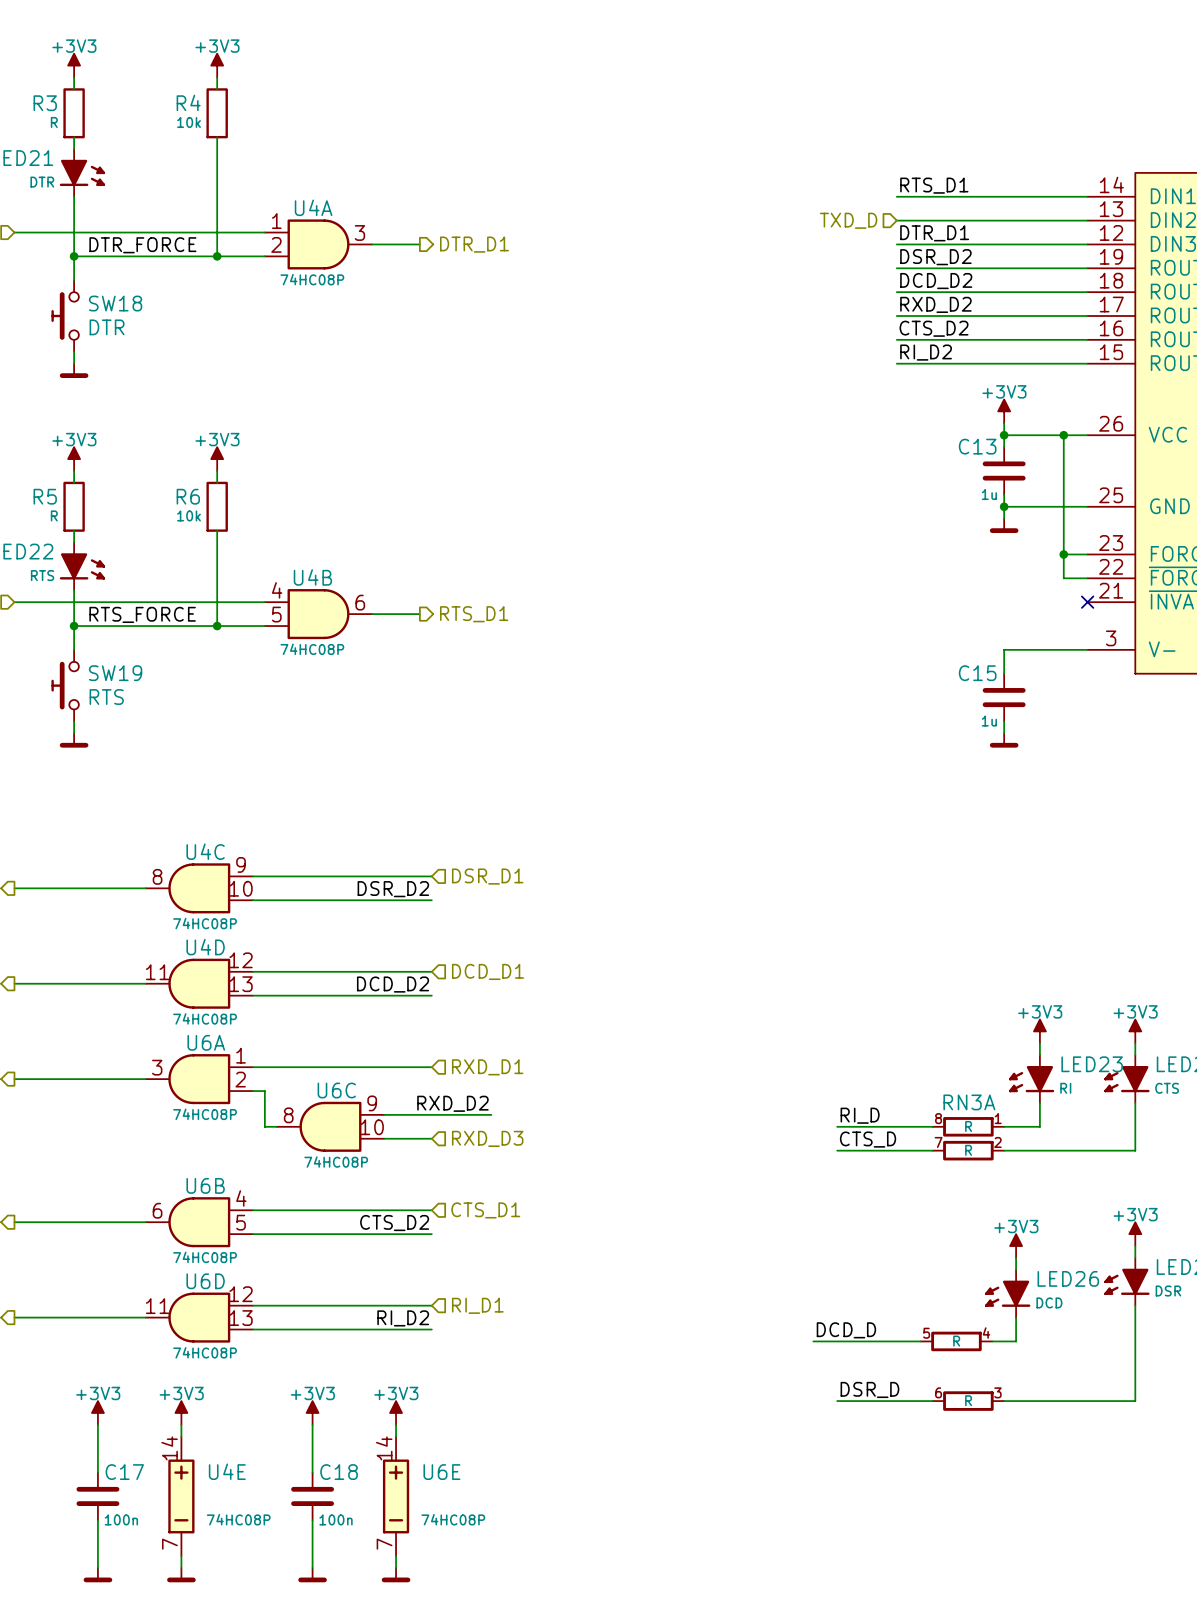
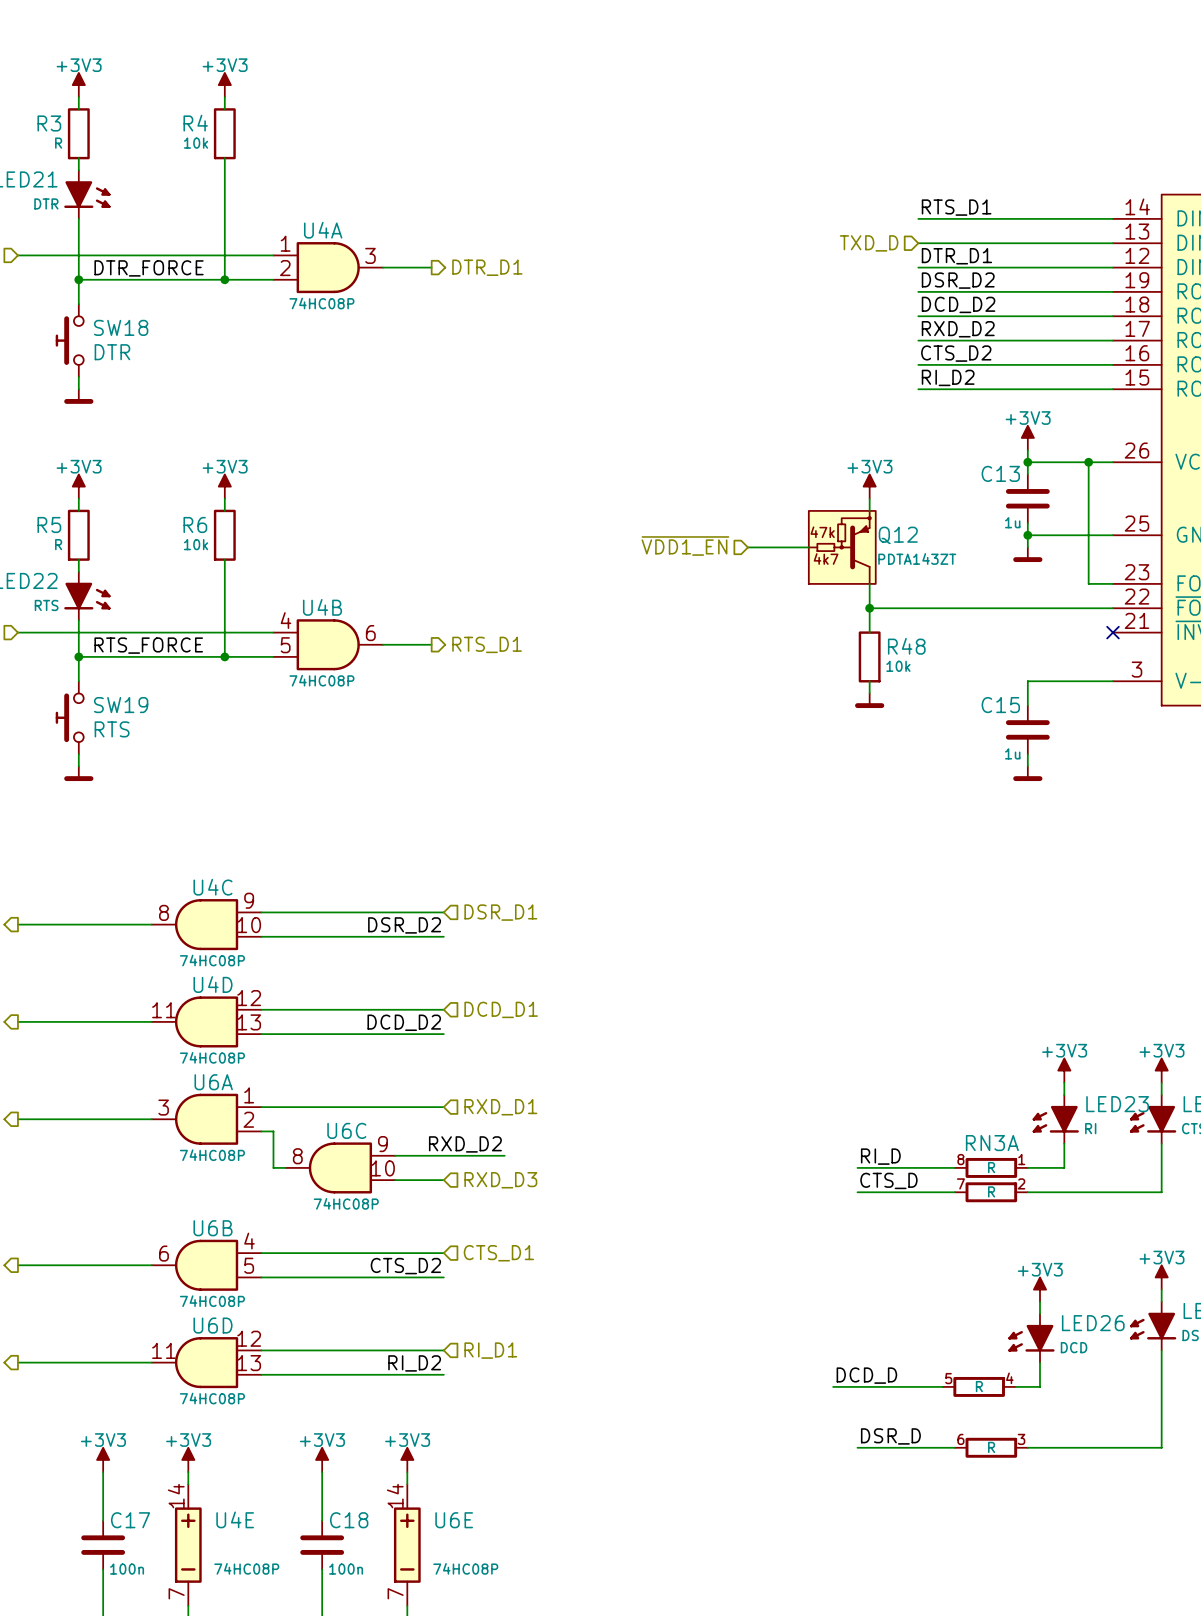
power symbol: none -> +3V3 (869, 486)
wire: none -> (869, 498) (869, 510)
hierarchical label: none -> ~{VDD1_EN} (685, 546)
wire: none -> (747, 547) (808, 547)
Q12: none -> PDTA143ZT (842, 547)
wire: none -> (869, 583) (869, 632)
wire: (1063, 554) (1063, 578) -> (869, 608) (1088, 608)
junction: (1063, 554) -> none
junction: none -> (869, 608)
R48: none -> 10k (869, 656)
wire: none -> (869, 681) (869, 693)
power symbol: none -> (869, 700)

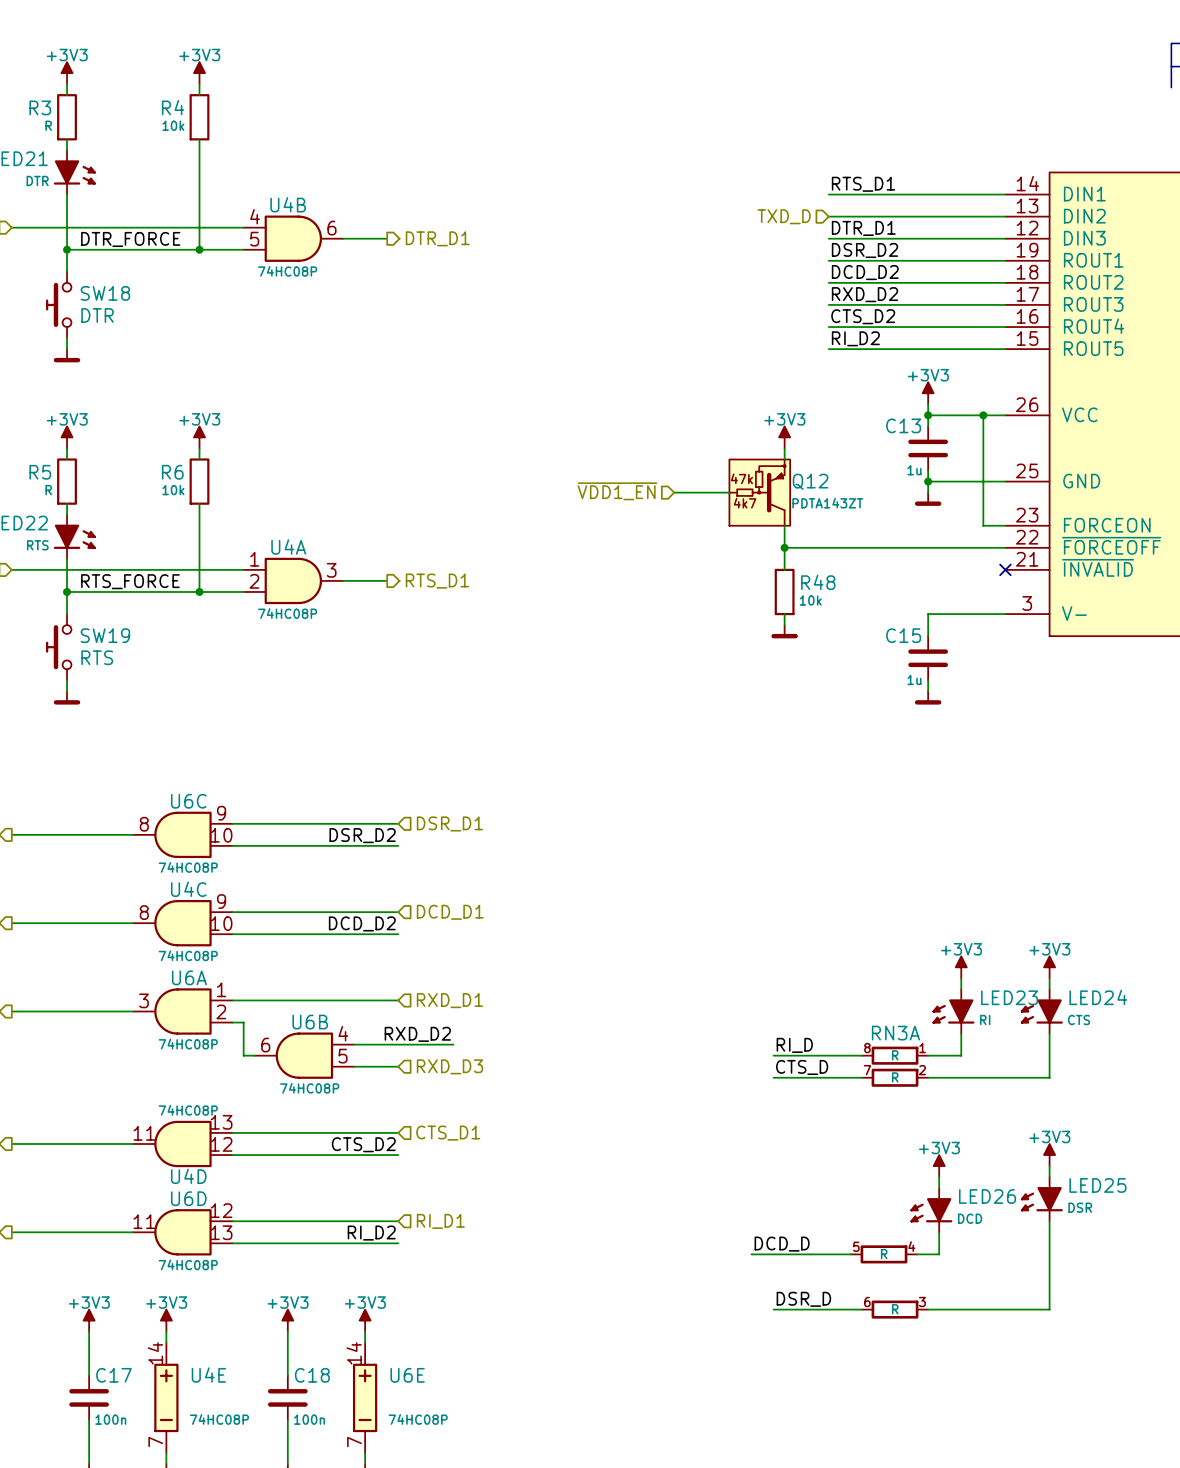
U4A position: (328, 267) -> (293, 580)
U4B position: (328, 644) -> (293, 238)
U4C name: U4C (212, 887) -> U6C (188, 801)
U4D flip: as is (206, 1021) -> up-down (182, 1143)
U4D position: (206, 1021) -> (182, 1143)
U4C: none -> 74HC08P (182, 923)
U6C: 74HC08P (340, 1167) -> none
U6B position: (206, 1265) -> (304, 1055)

